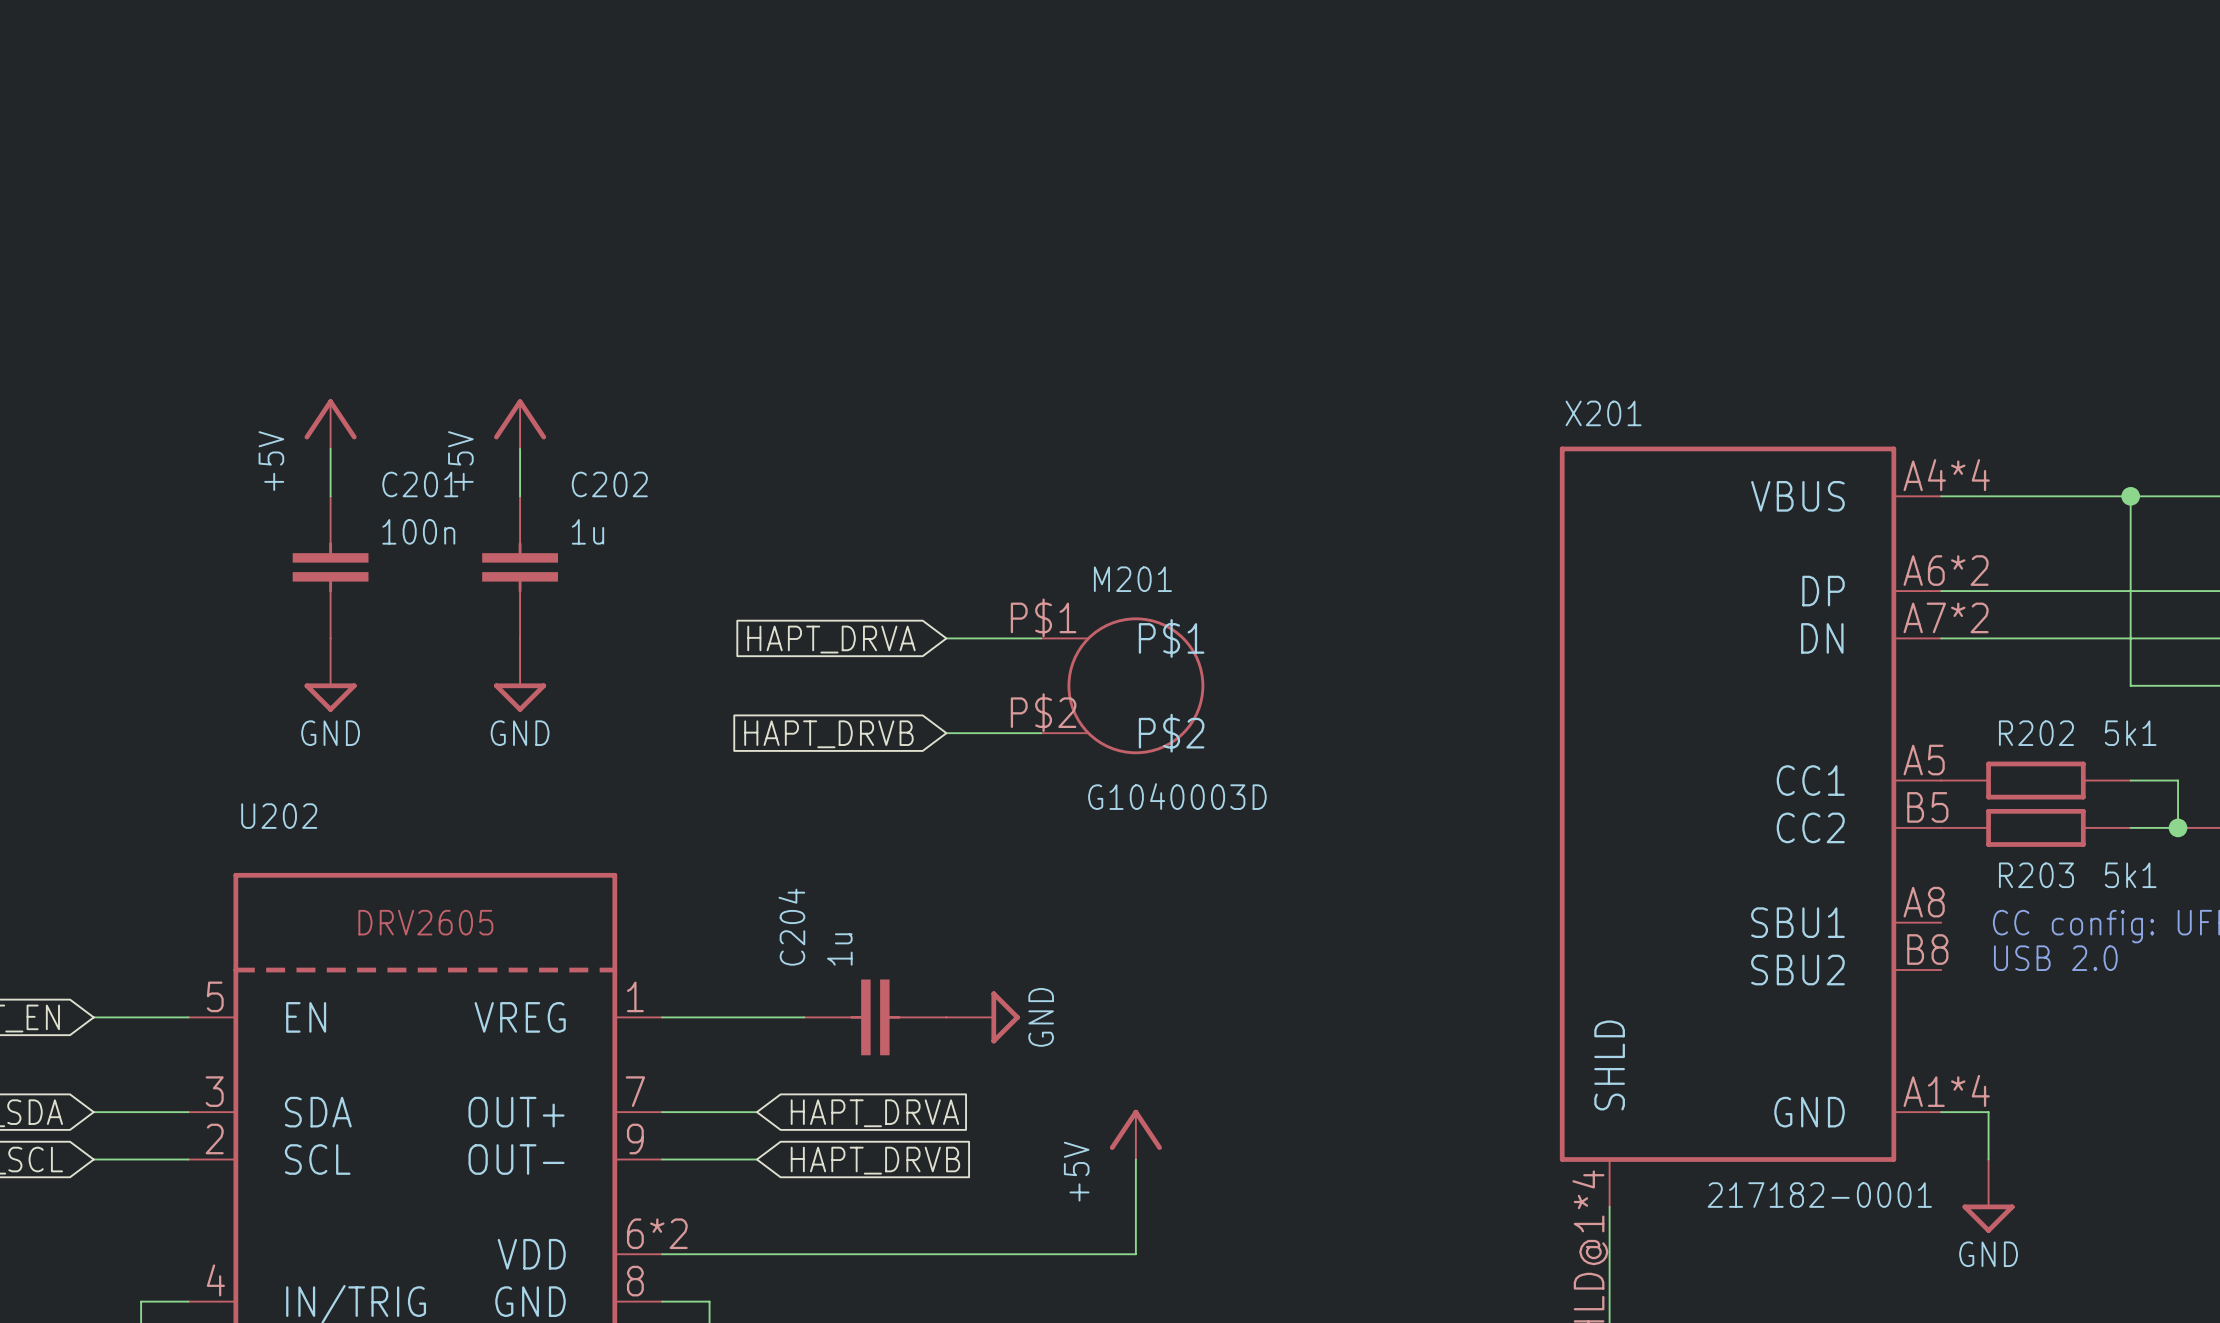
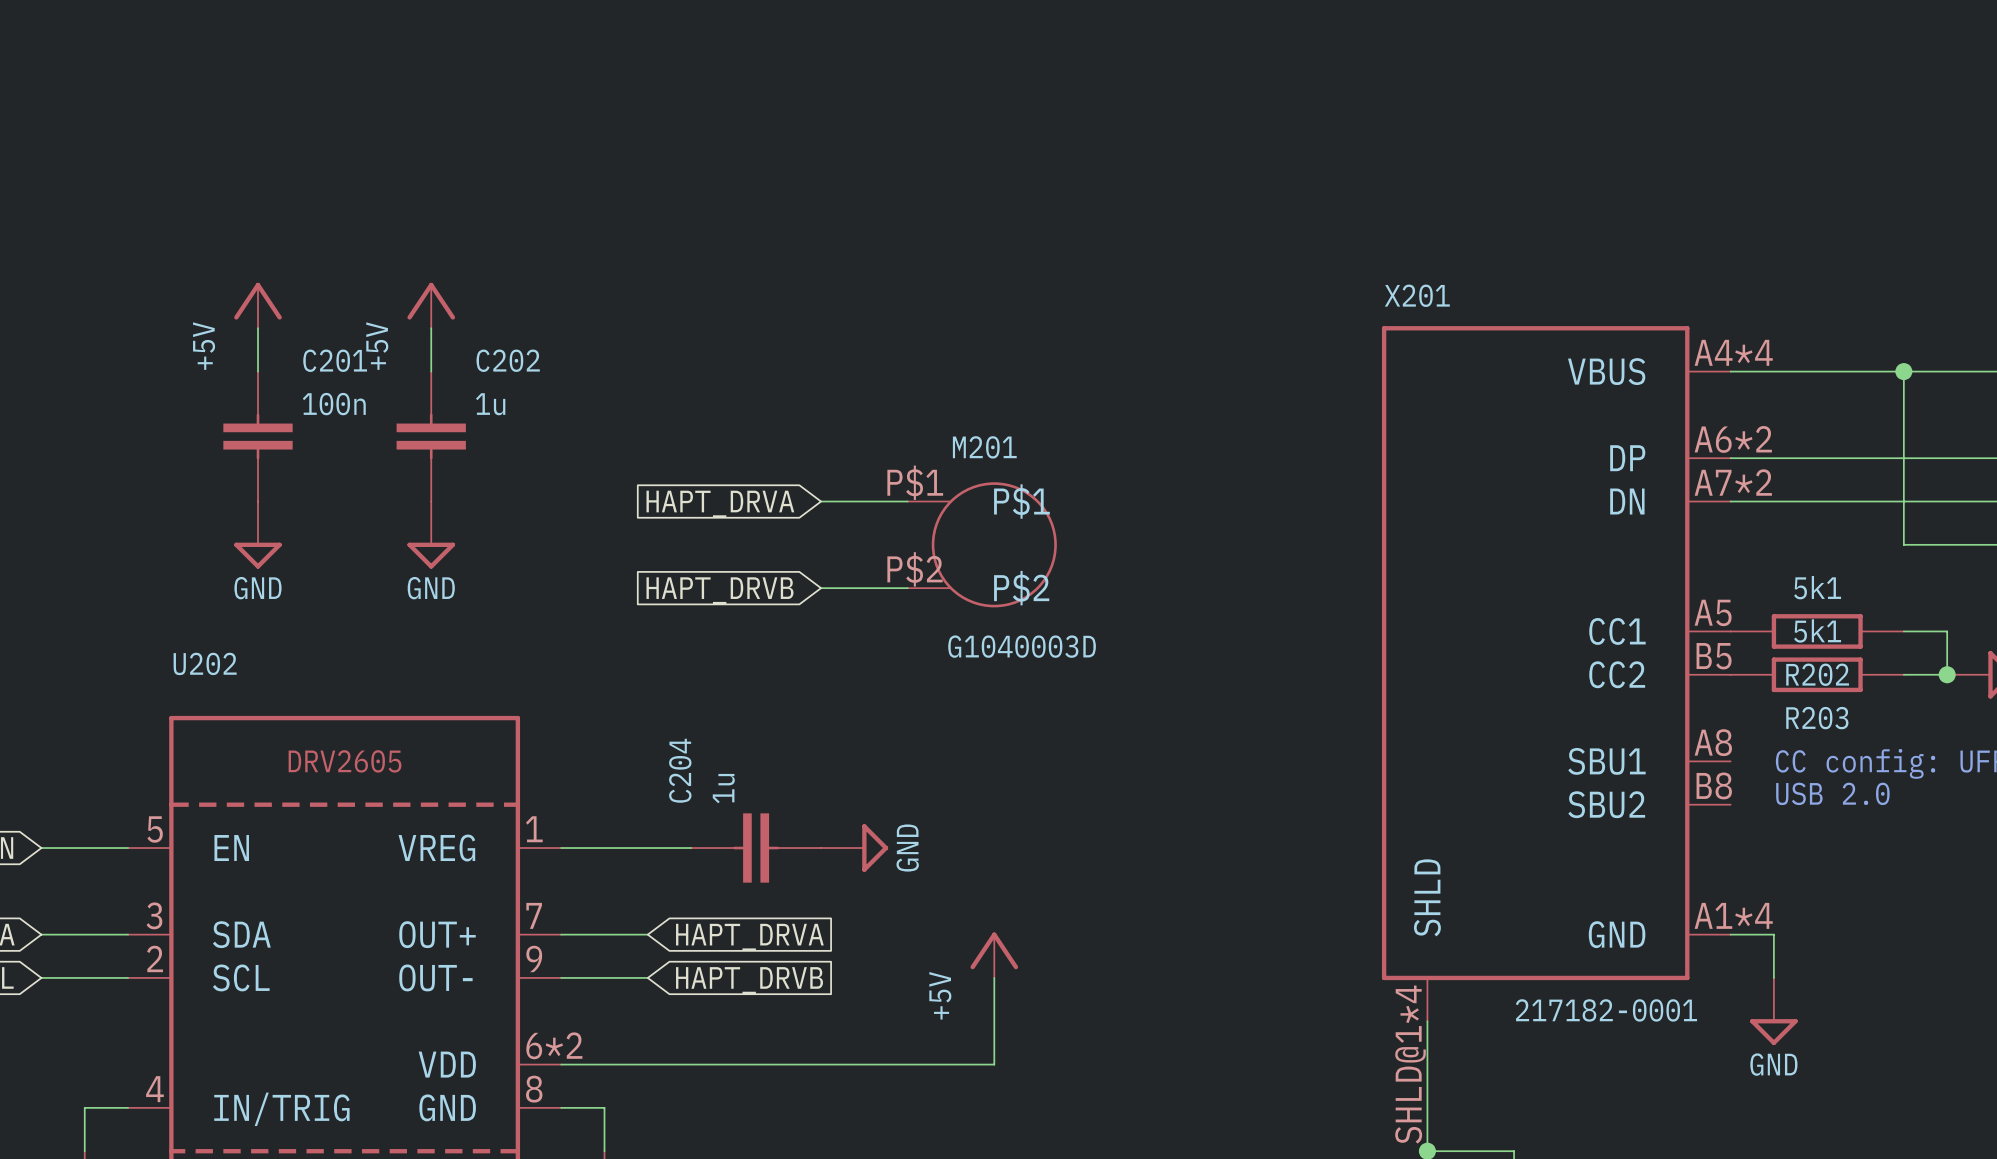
R202 name position: R202 (2036, 733) -> R202 (1817, 674)
R202 value position: 5k1 (2130, 733) -> 5k1 (1817, 587)
R203 value position: 5k1 (2130, 875) -> 5k1 (1817, 630)

